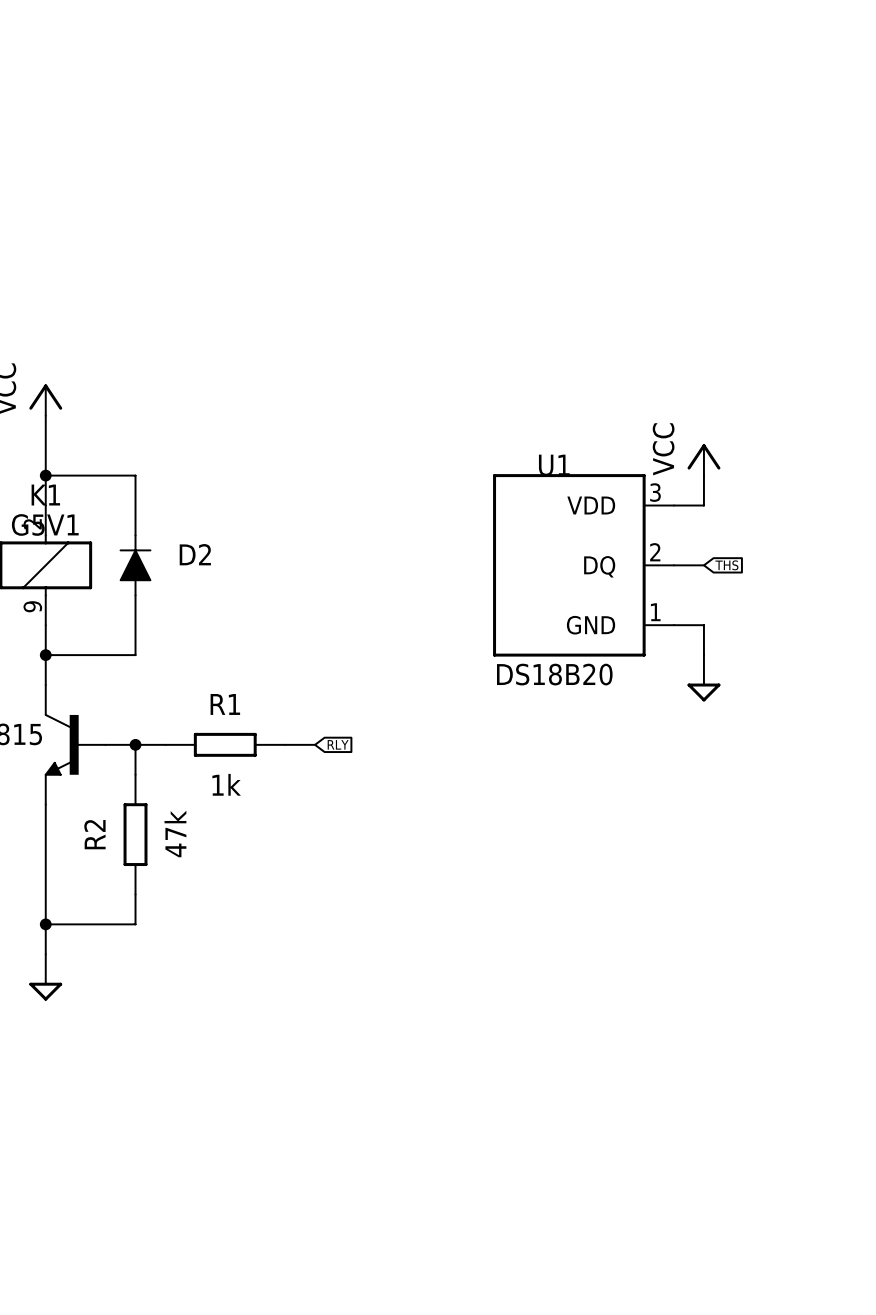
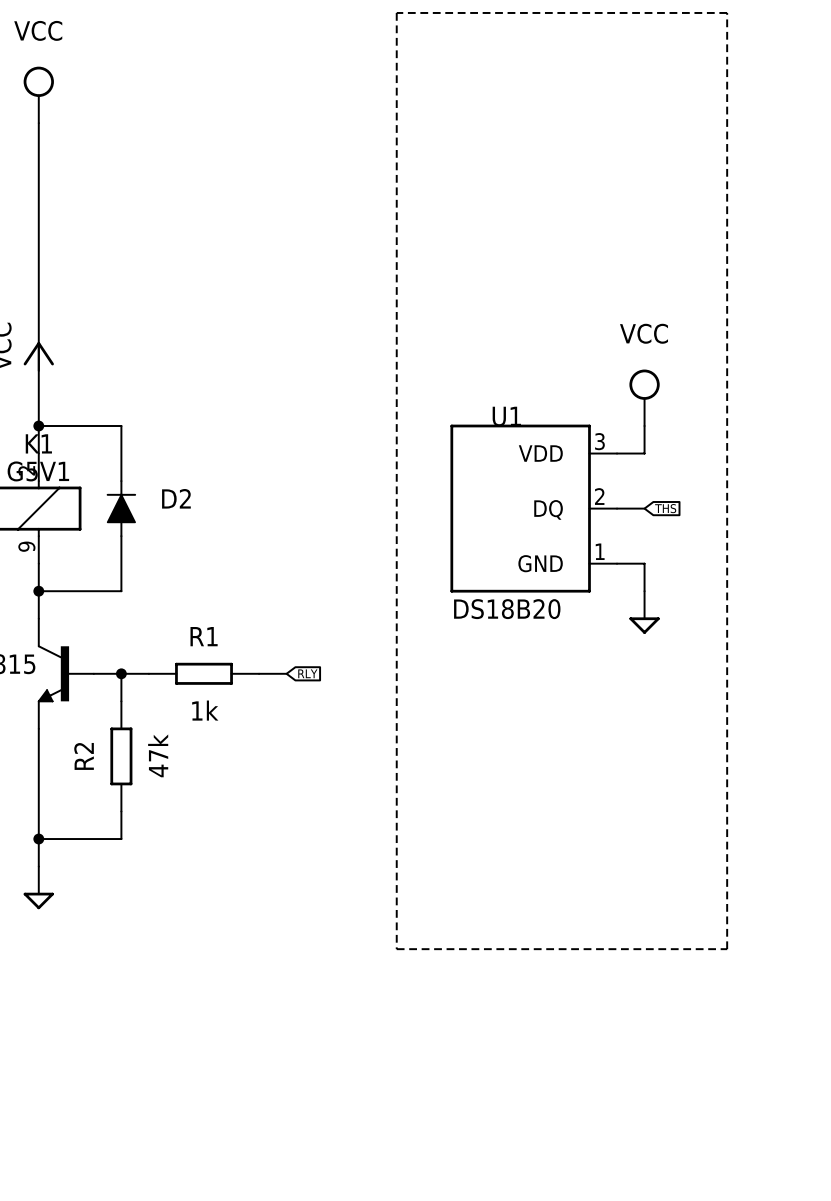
line: none -> (396, 12) (396, 949) (727, 949) (727, 12) (396, 12)
power symbol: none -> VCC (38, 94)
wire: none -> (38, 123) (38, 370)
power symbol: none -> VCC (644, 397)
power symbol: VCC (703, 459) -> none

